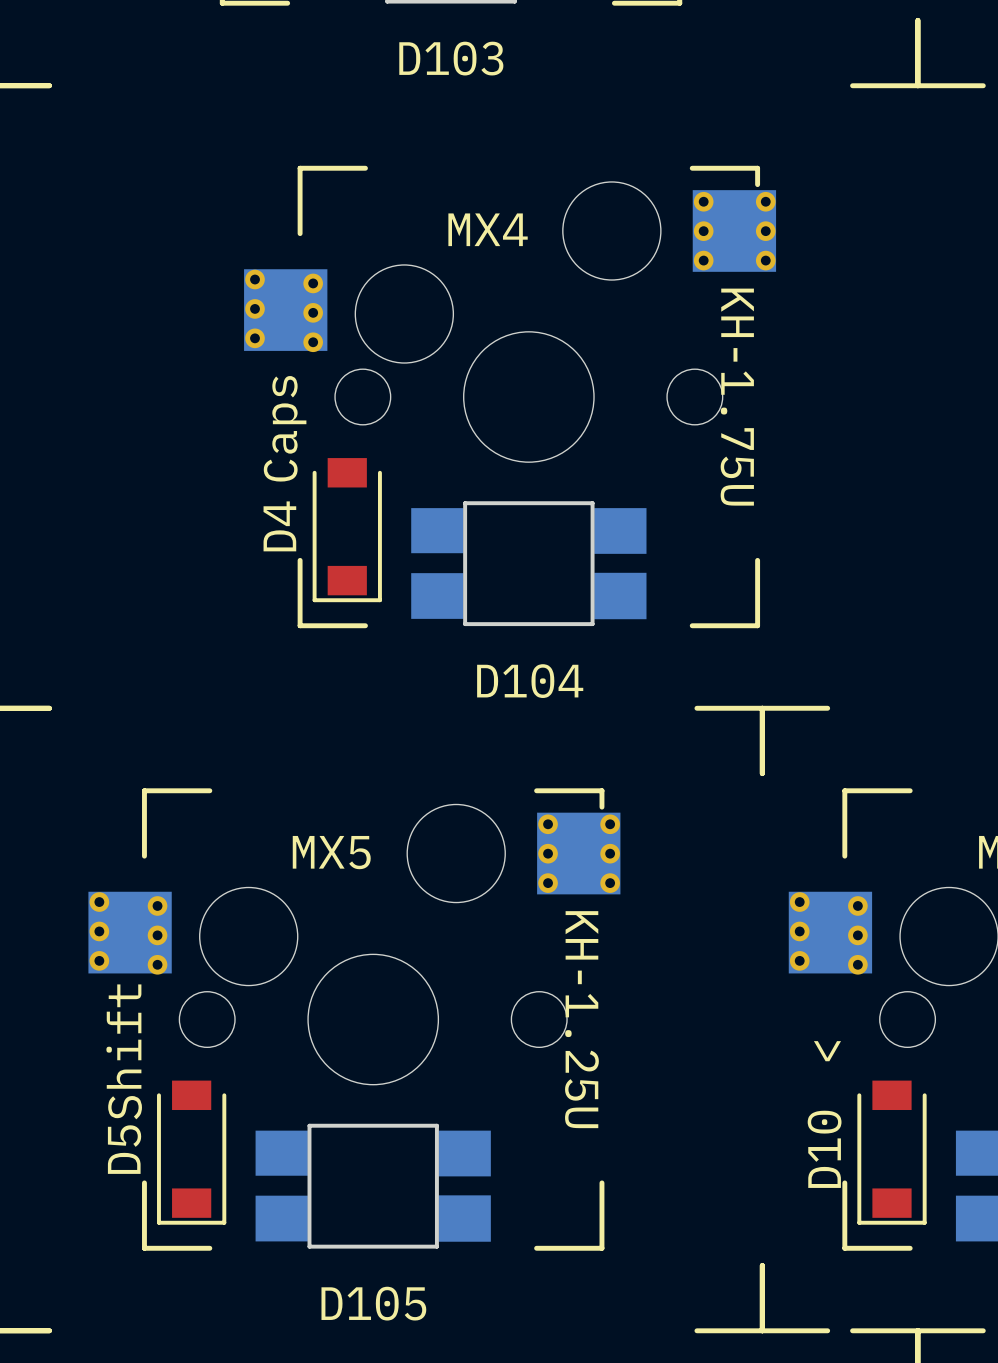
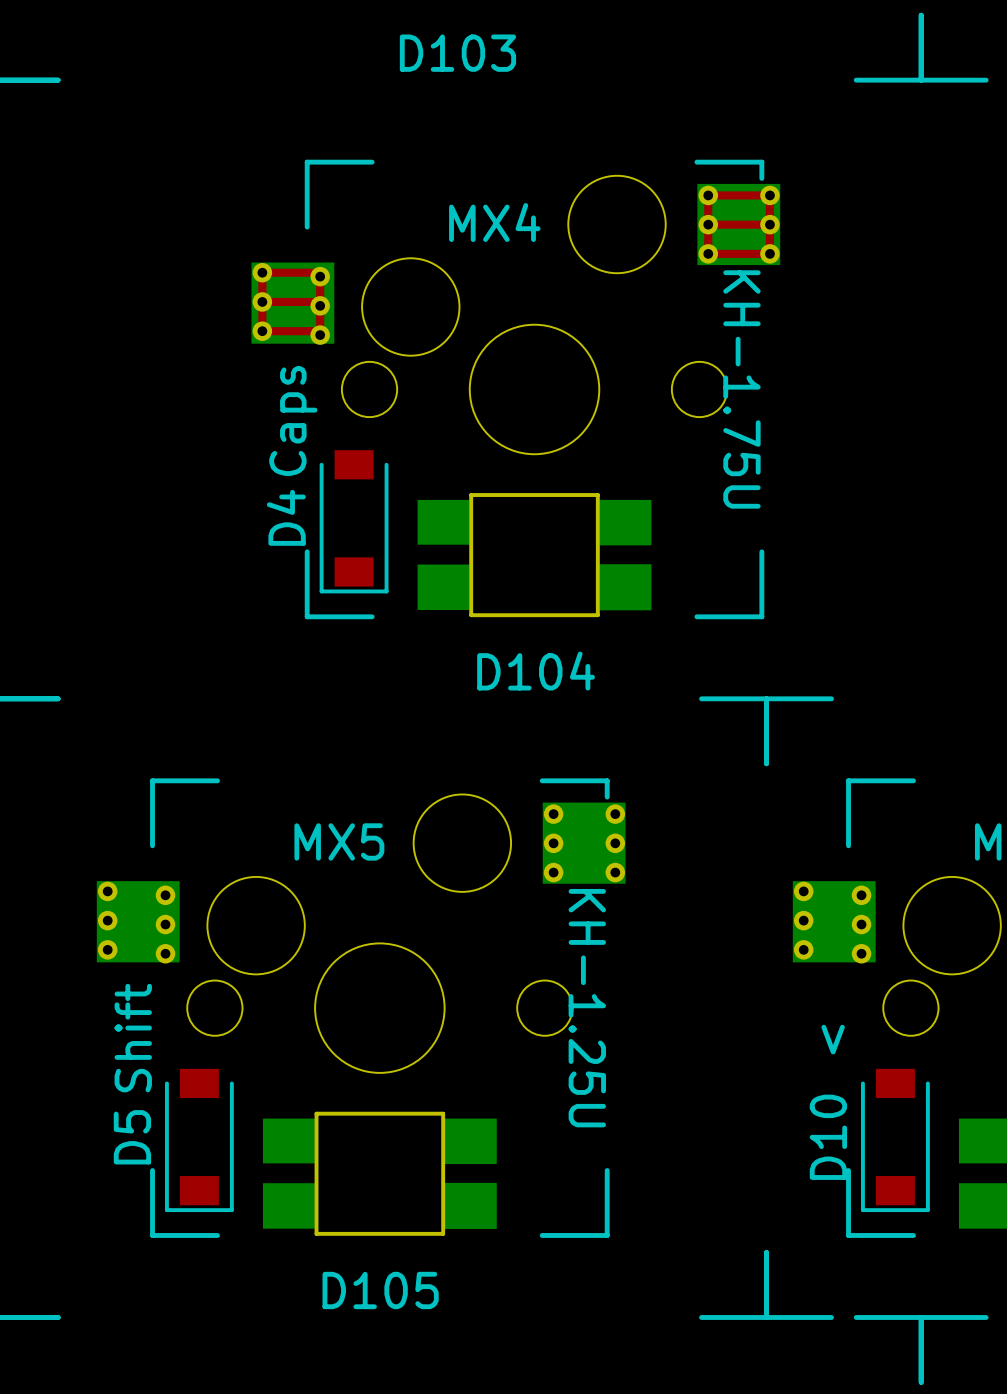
top track: none -> (708, 195) (769, 195) (769, 253) (708, 253) (708, 195)
top track: none -> (708, 224) (769, 224)
top track: none -> (262, 272) (316, 272) (320, 276) (320, 335) (316, 331) (262, 331) (262, 272)
top track: none -> (262, 301) (316, 301) (320, 305)

